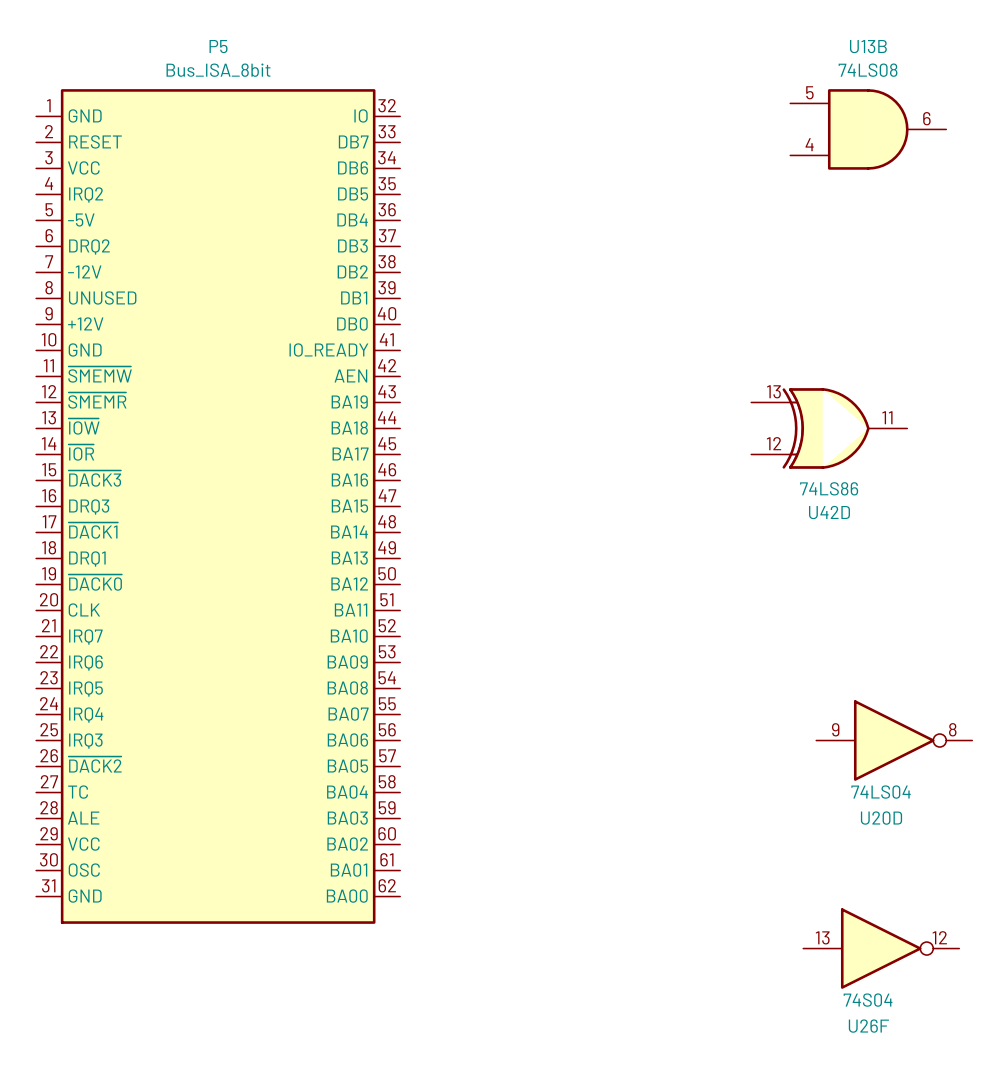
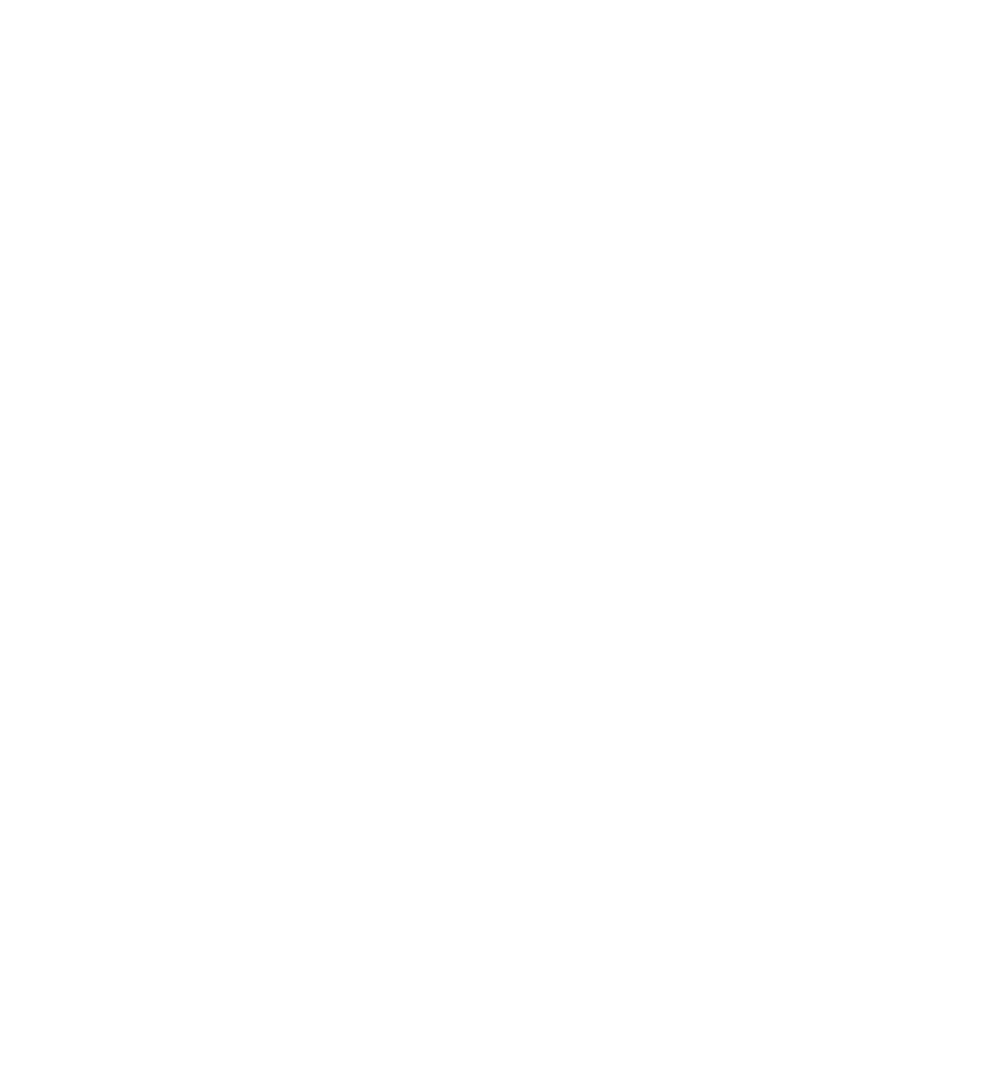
U13B: 74LS08 (868, 129) -> none
U42D: 74LS86 (829, 428) -> none
P5: Bus_ISA_8bit (218, 506) -> none
U20D: 74LS04 (894, 740) -> none
U26F: 74S04 (881, 948) -> none

